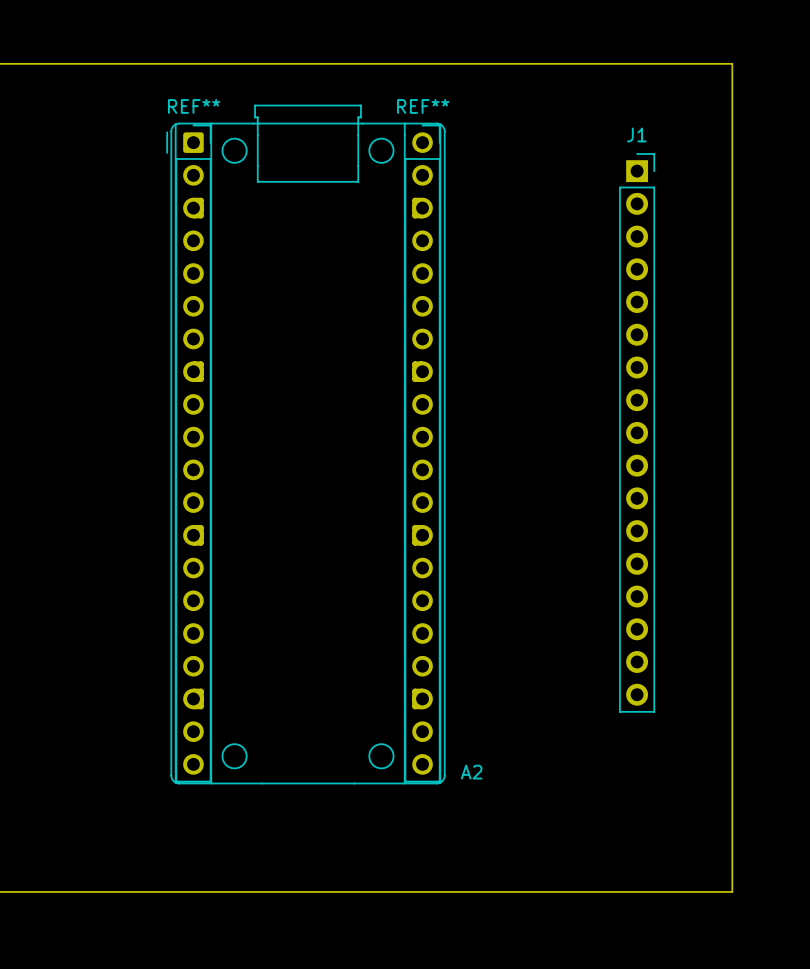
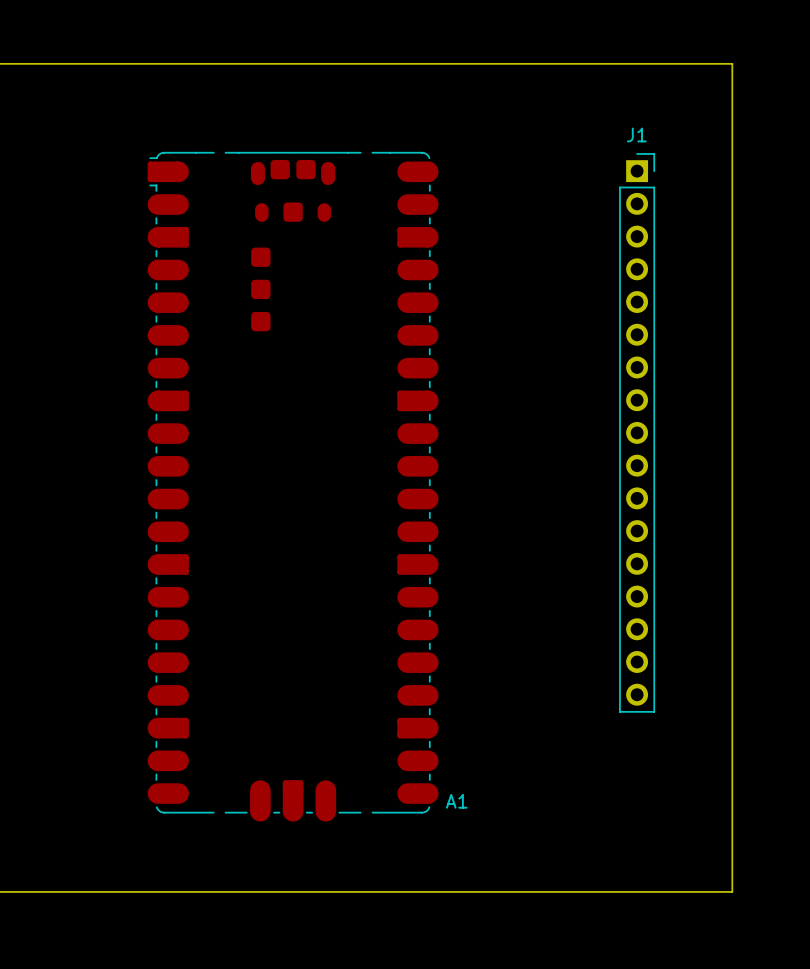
A2: (305, 444) -> none
REF**: (193, 453) -> none
REF**: (422, 453) -> none
A1: none -> (293, 486)

